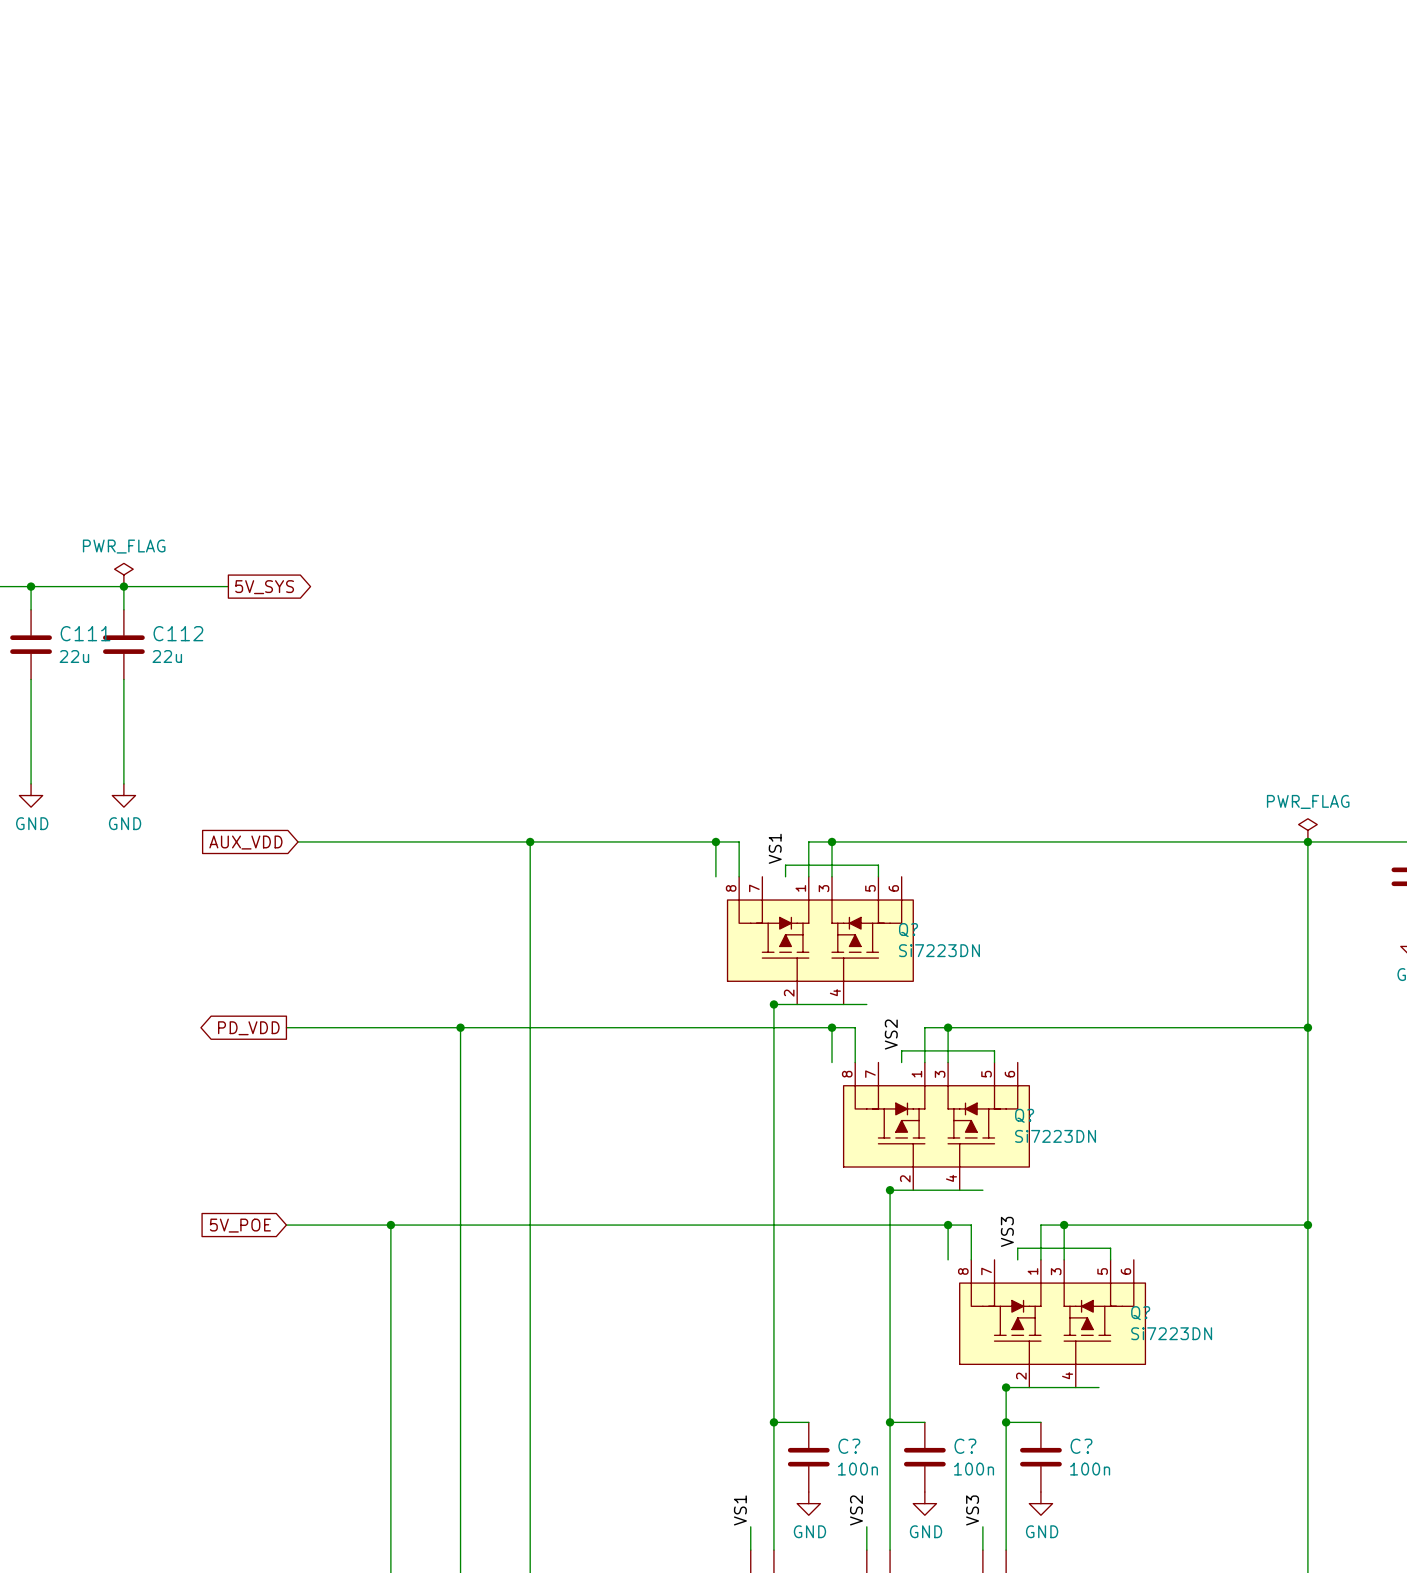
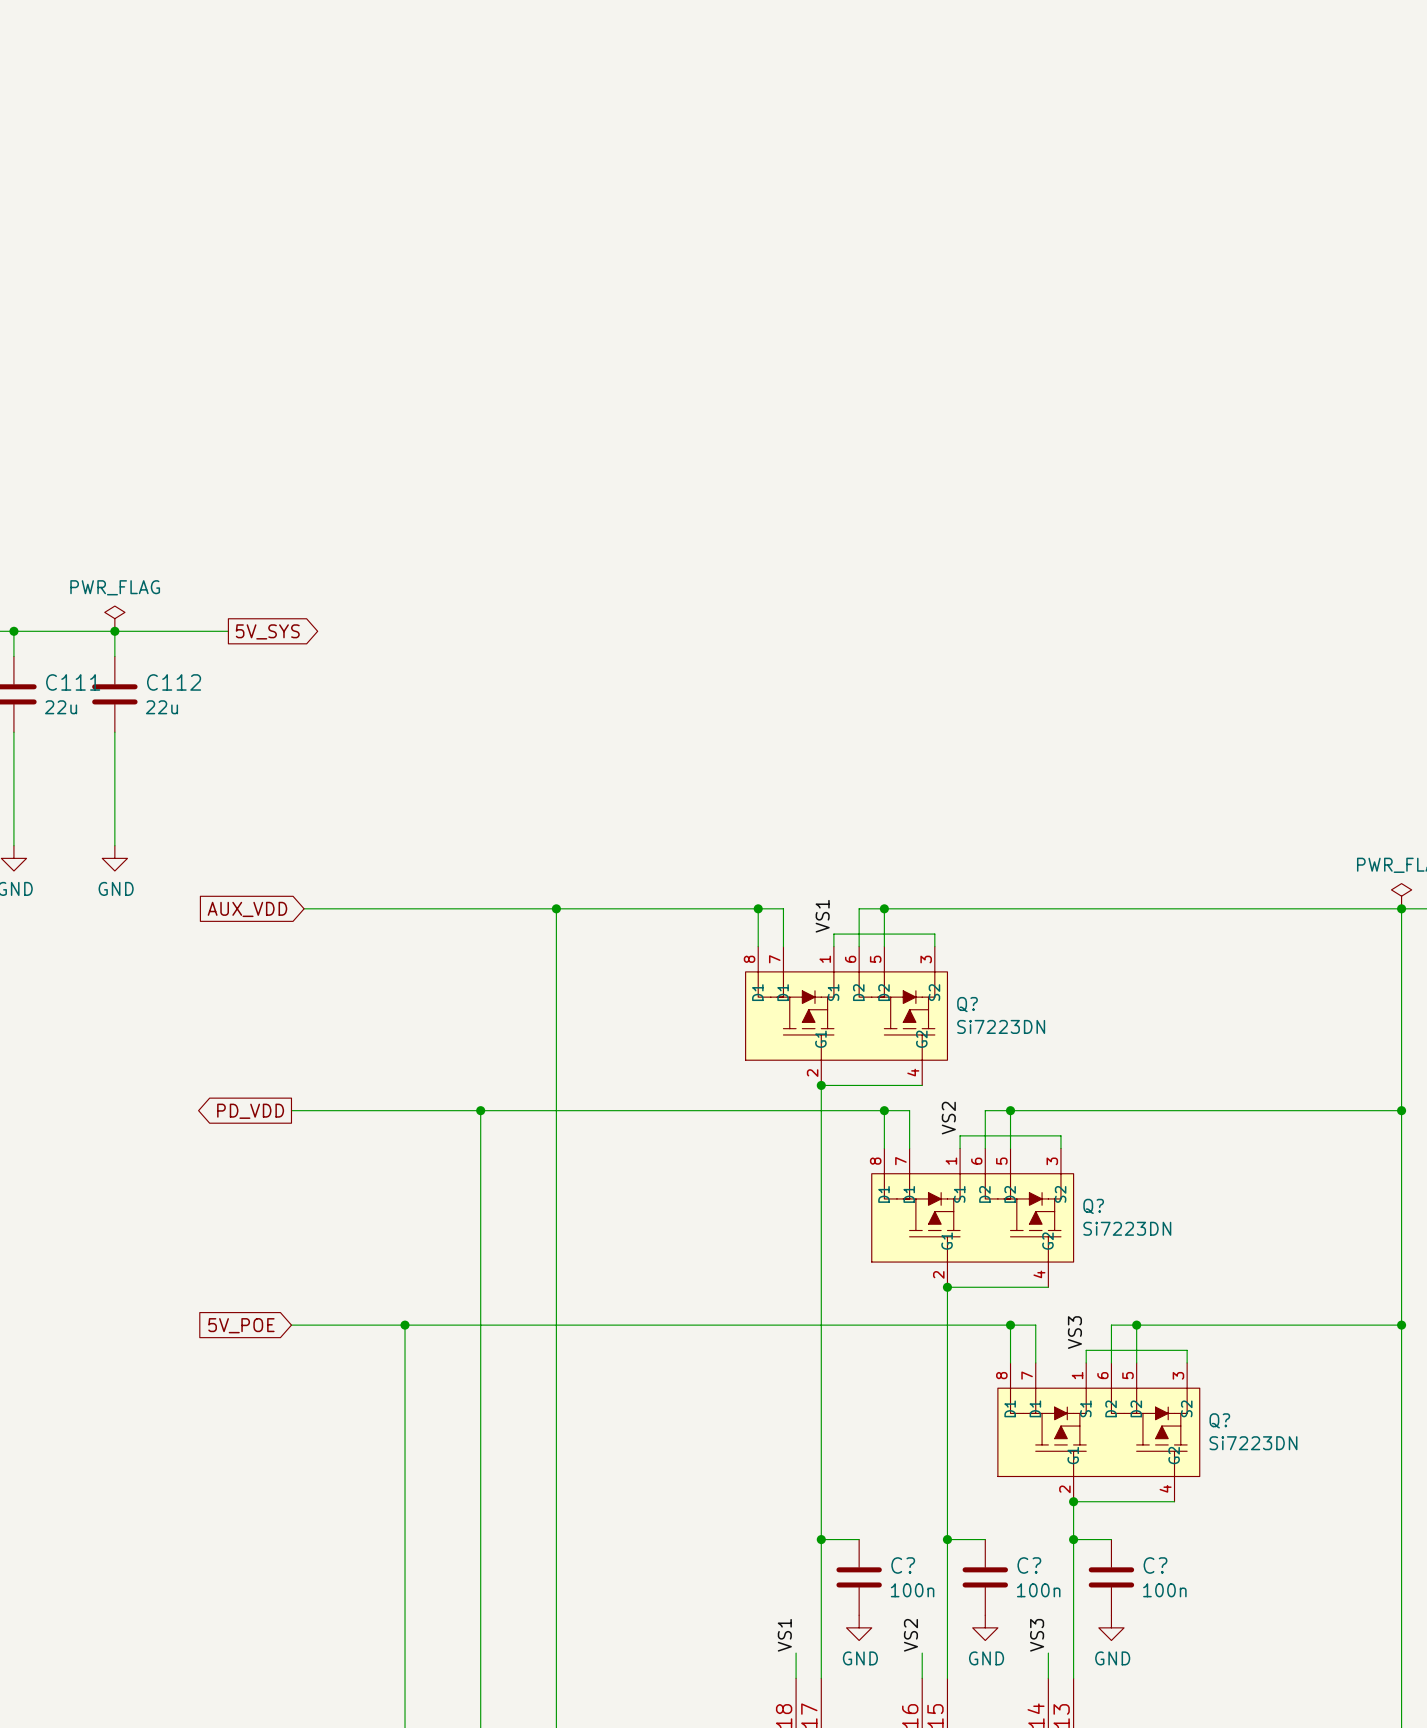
Q?: none -> Si7223DN (846, 1016)
Q?: Si7223DN (820, 940) -> none
Q?: none -> Si7223DN (972, 1217)
Q?: Si7223DN (936, 1126) -> none
Q?: none -> Si7223DN (1098, 1432)
Q?: Si7223DN (1052, 1323) -> none

